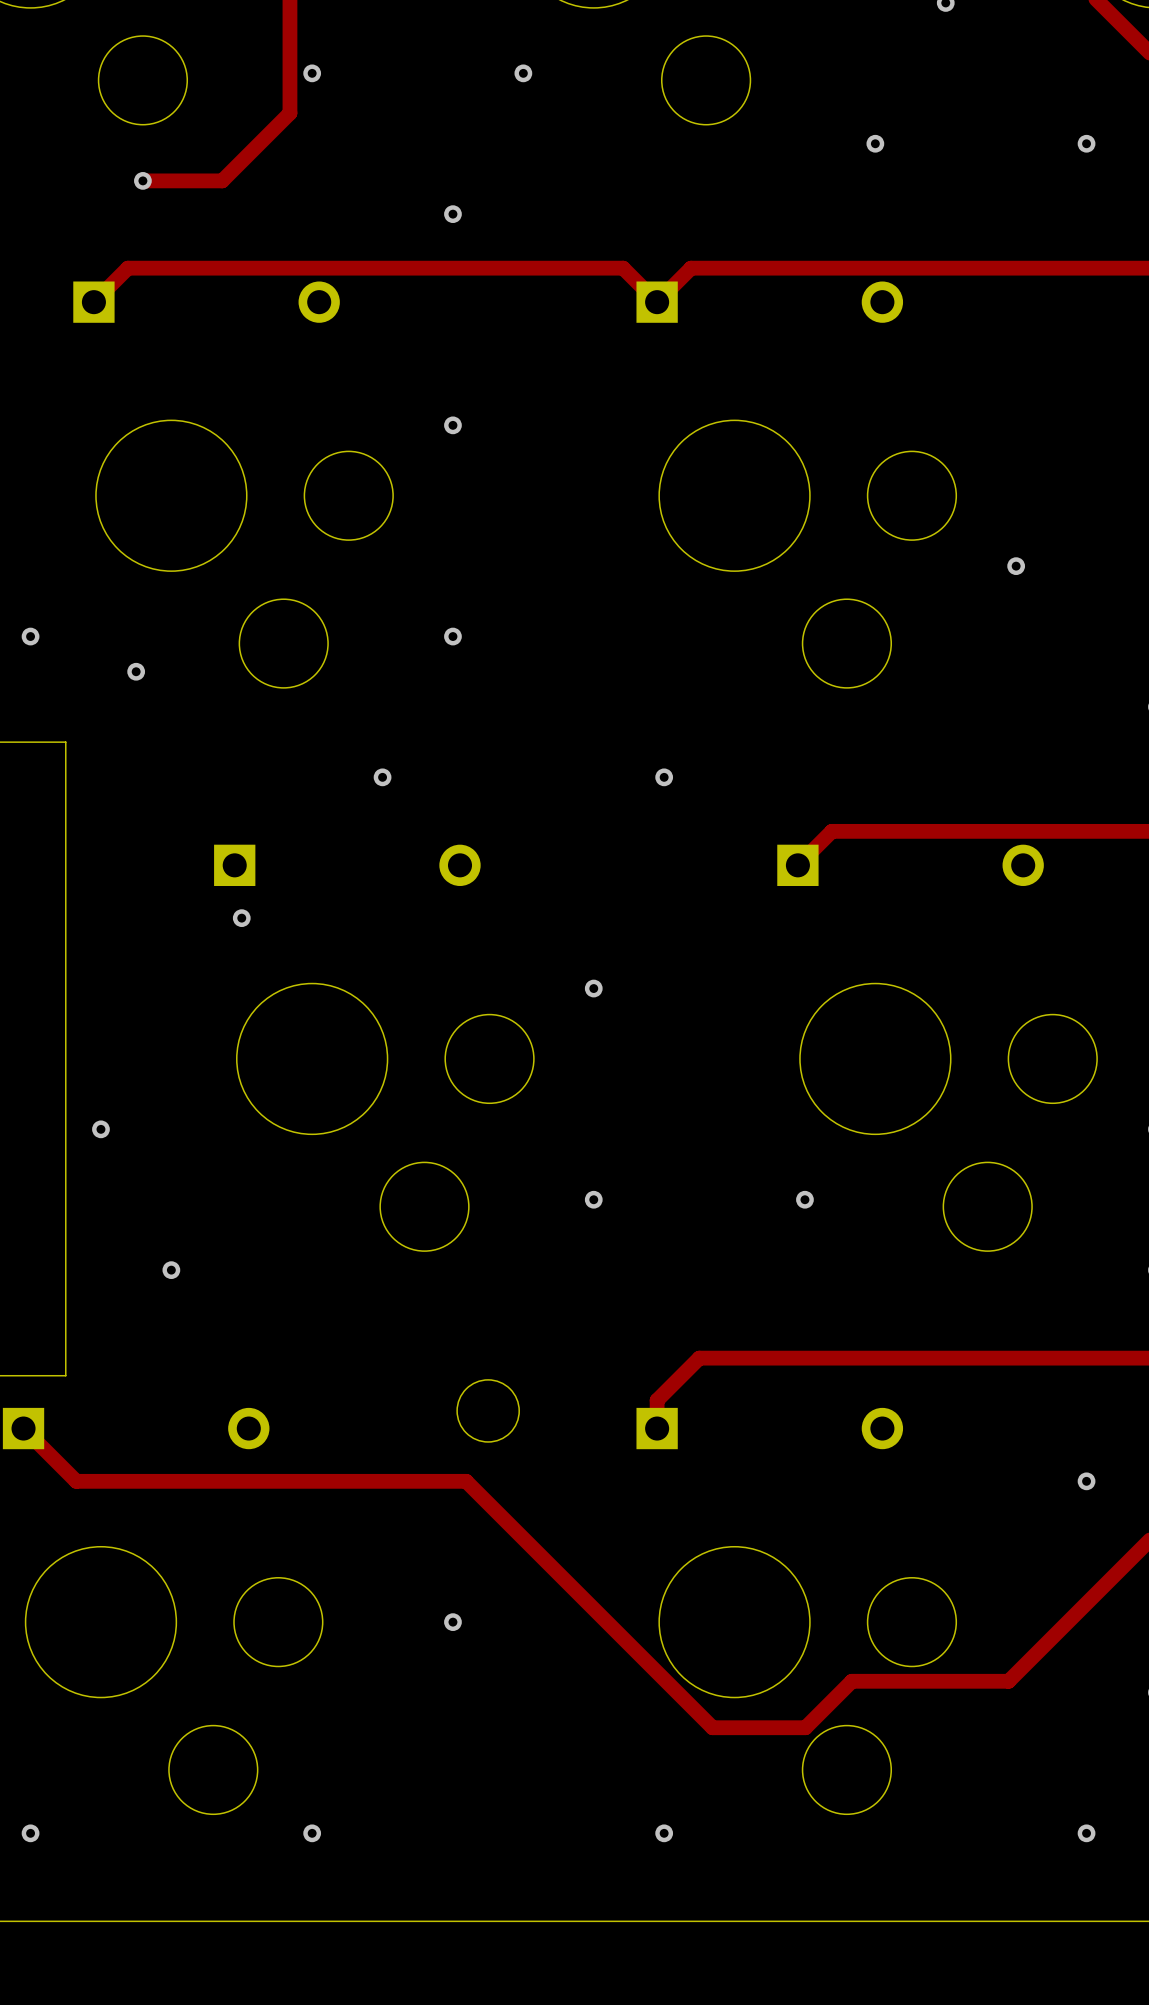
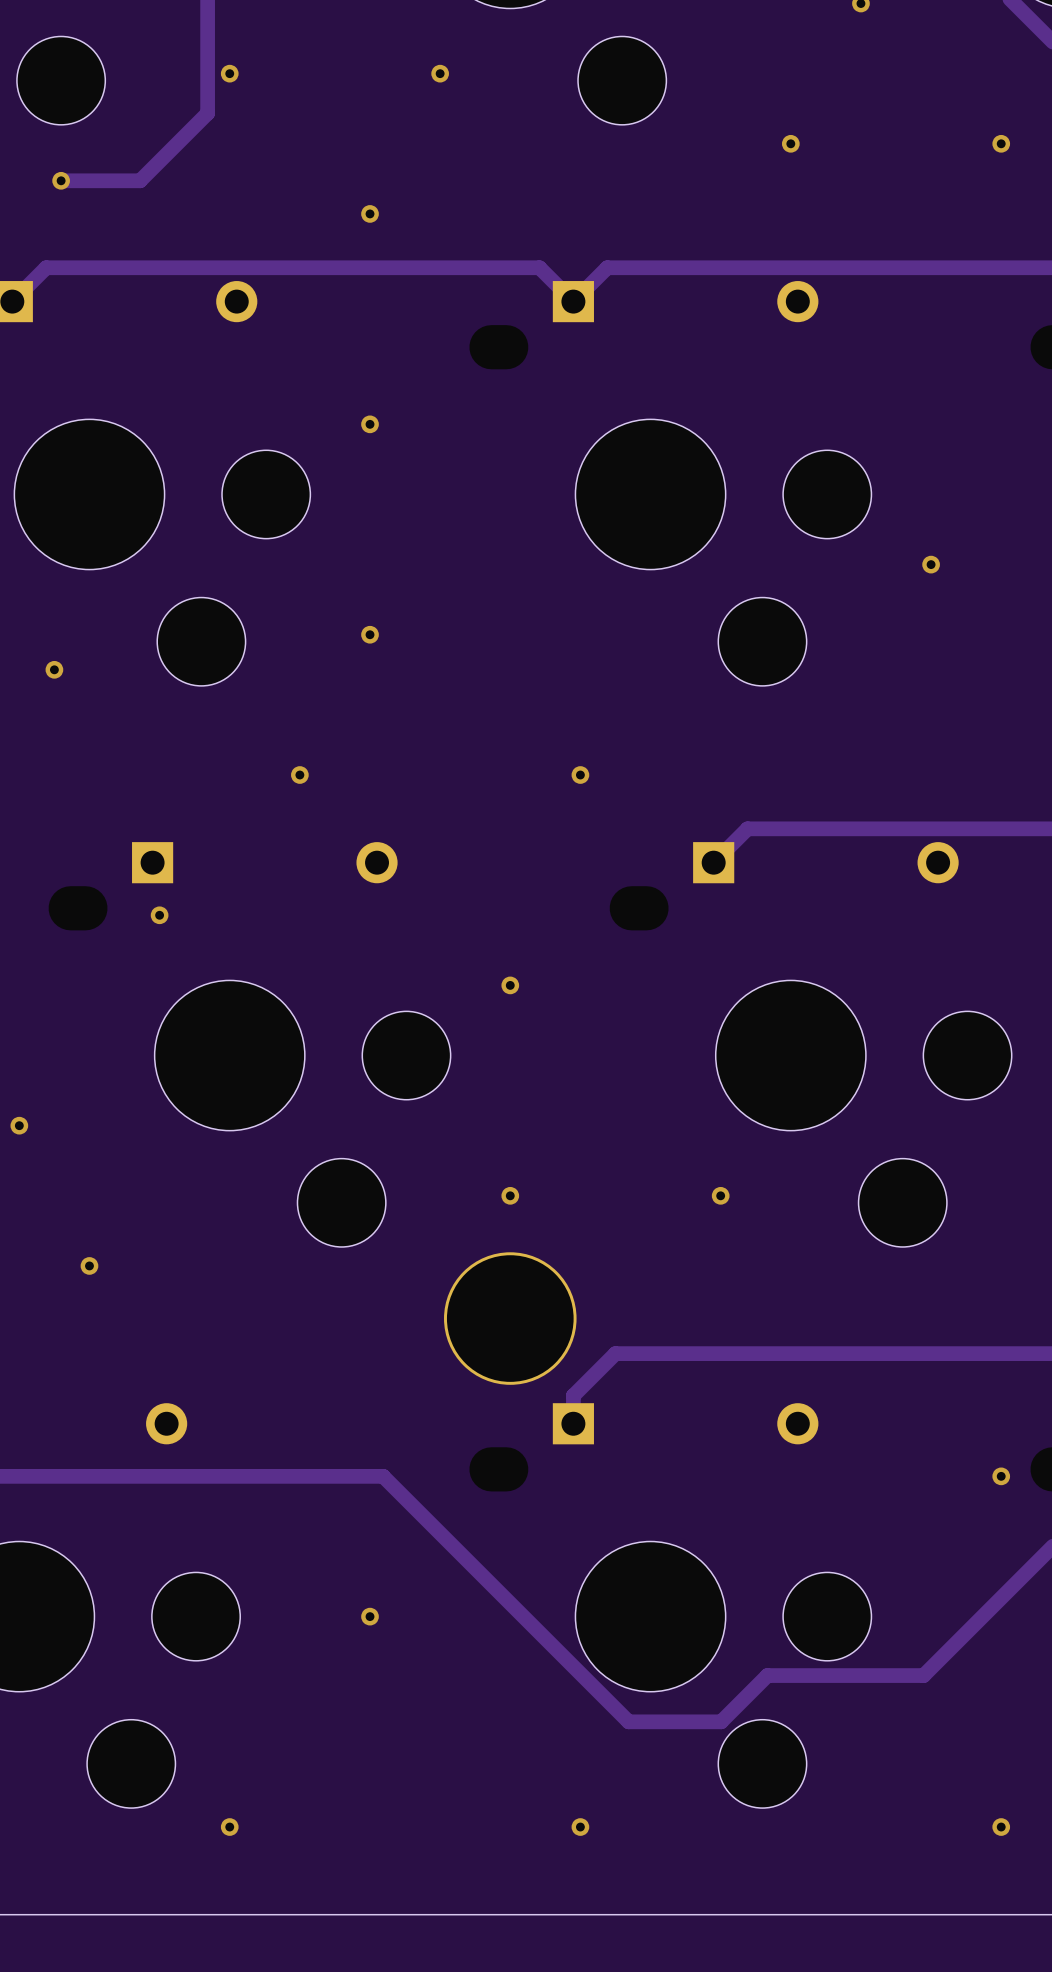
part: none -> (510, 1318)
round board edge: [456, 1379, 520, 1443] -> none

